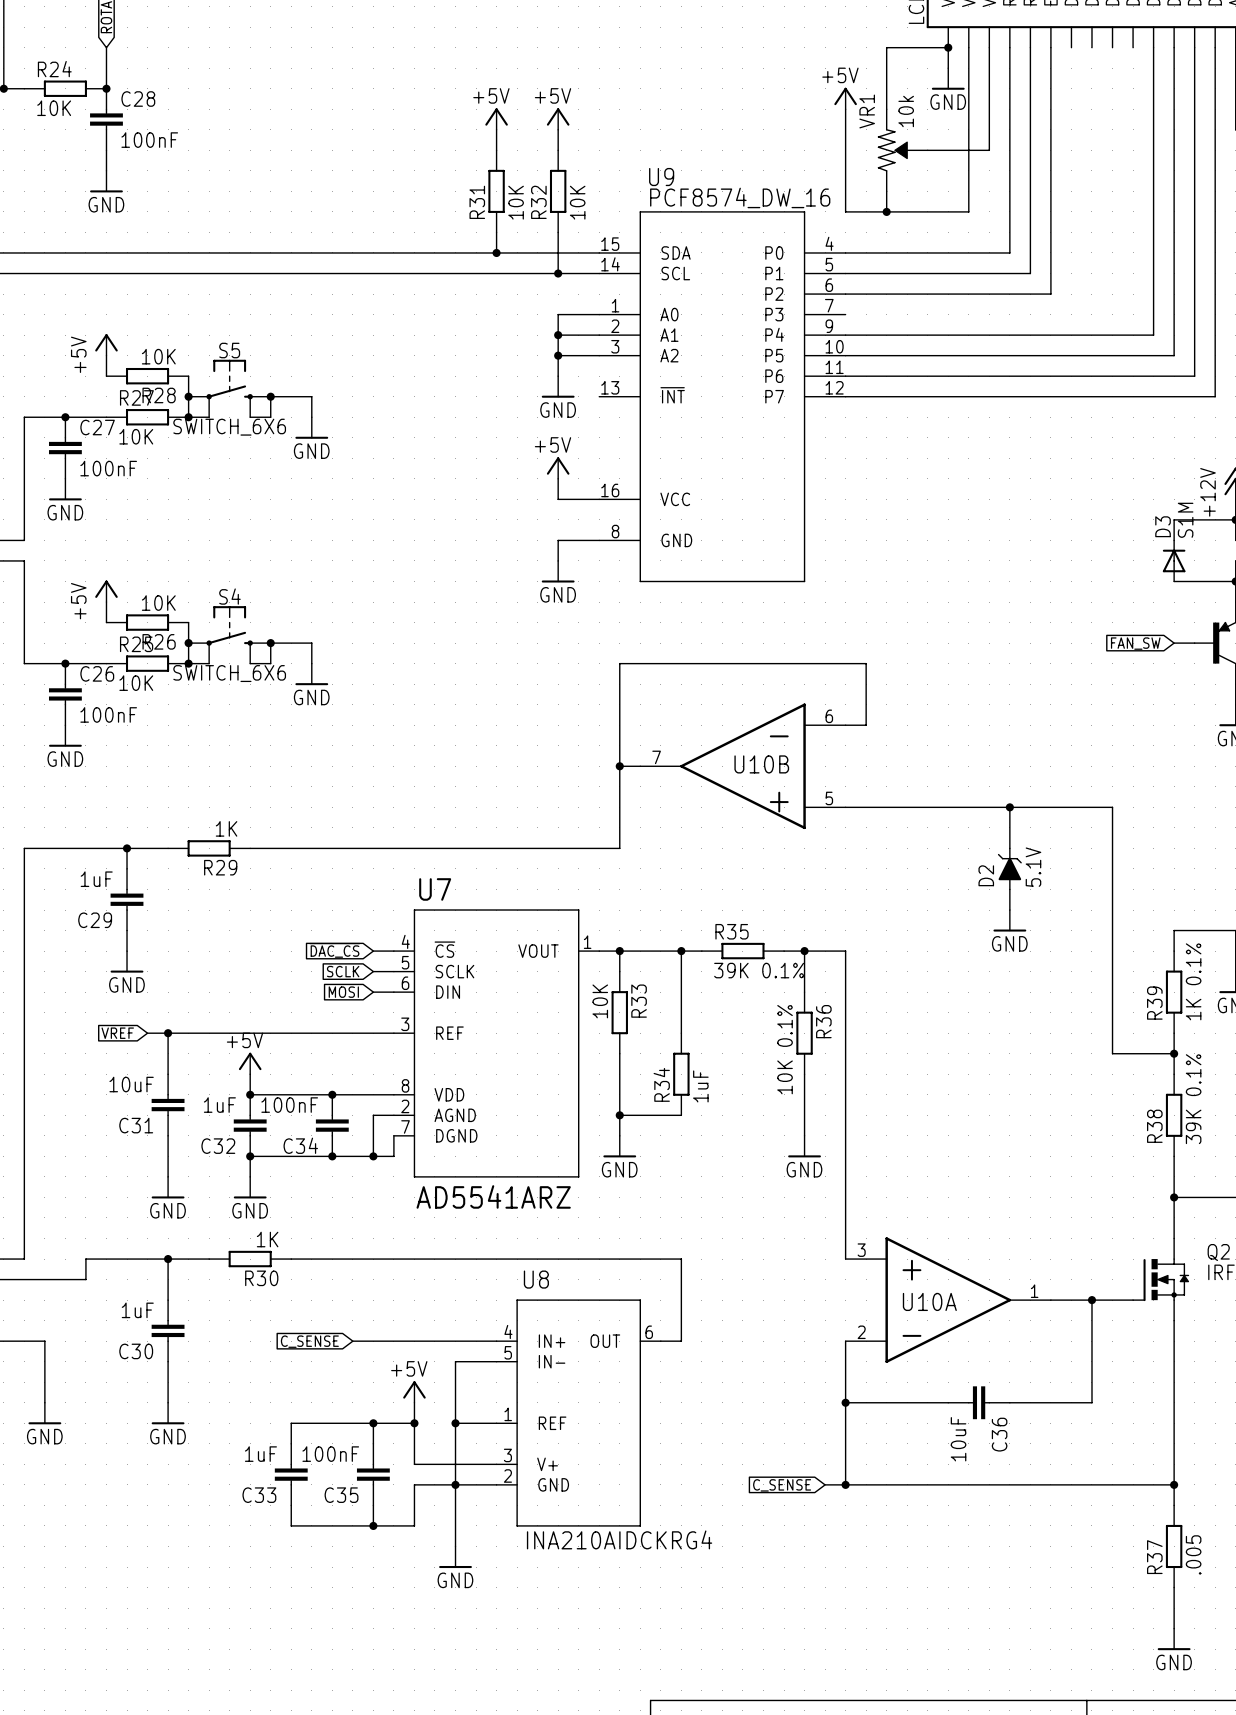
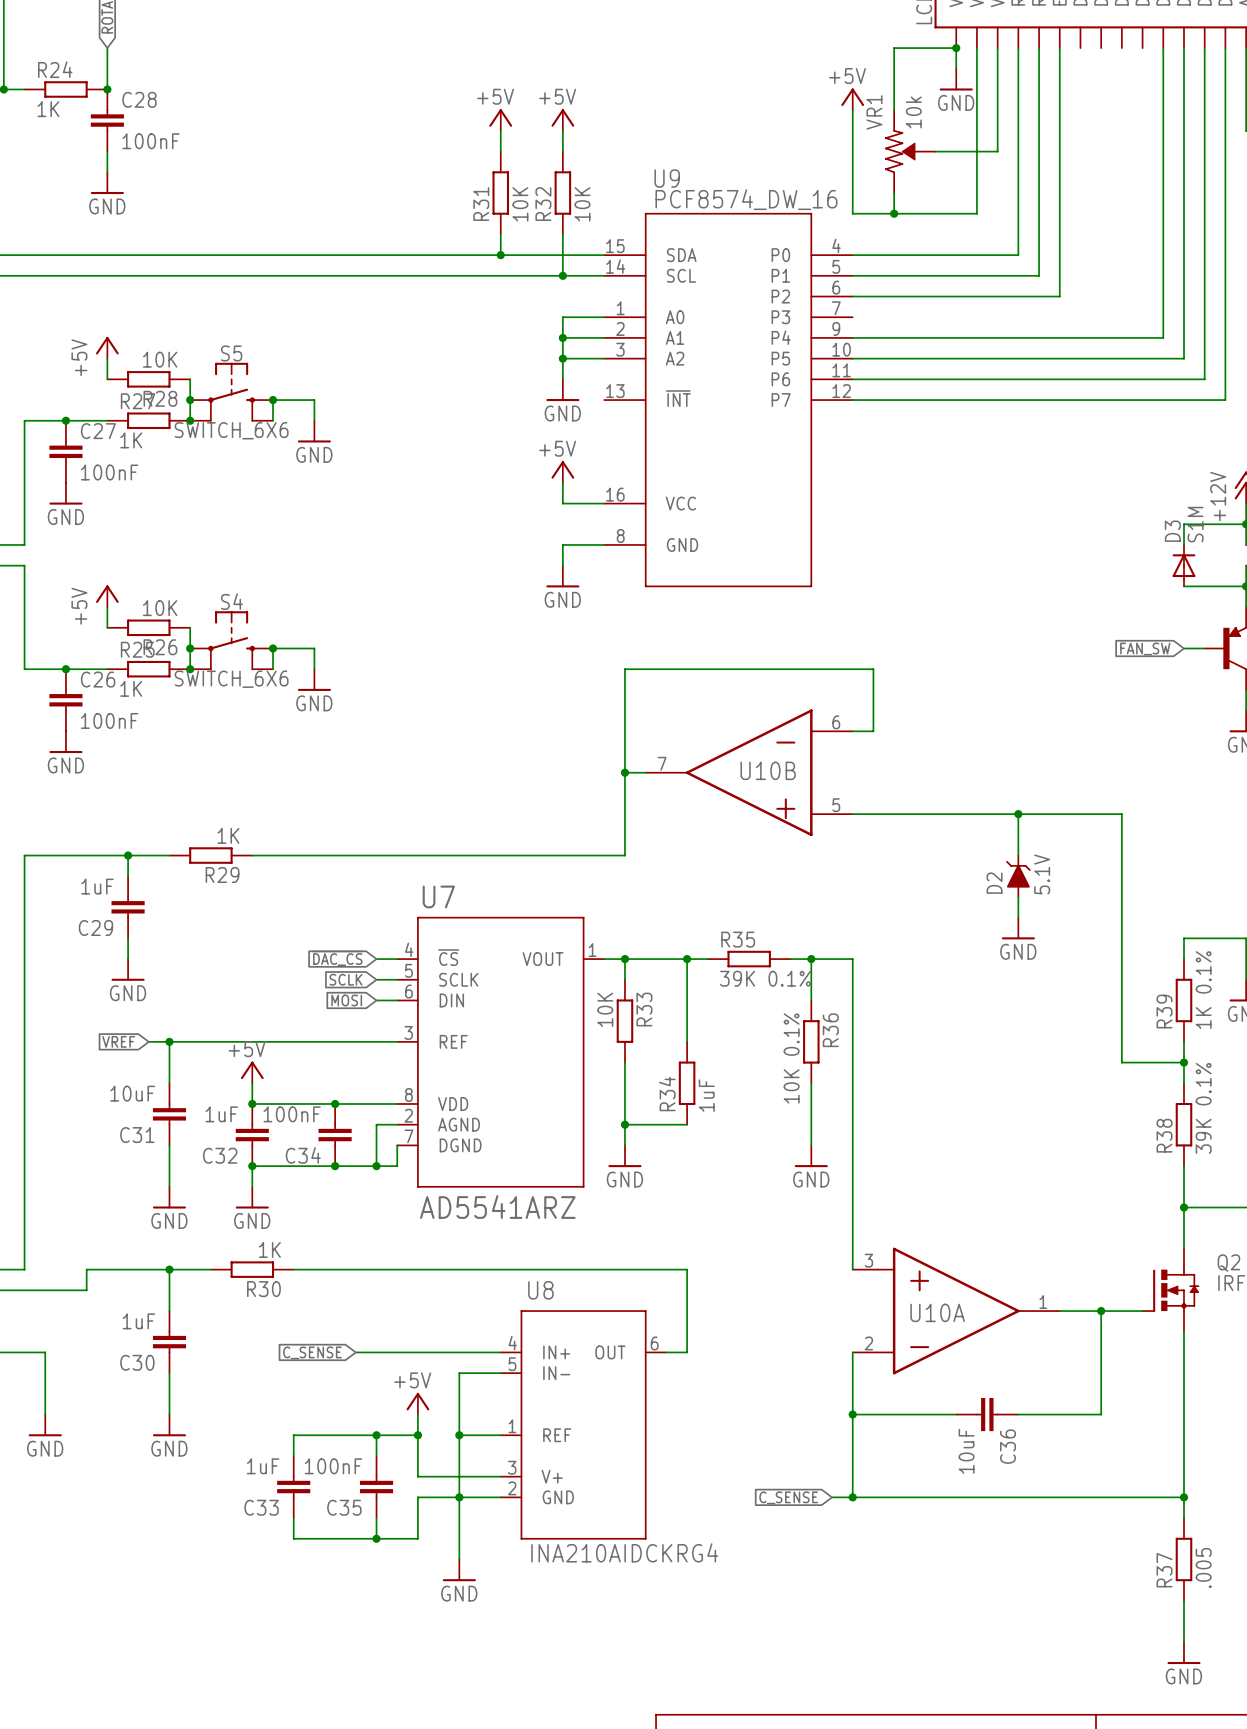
R24 value: 10K (54, 108) -> 1K (48, 109)
R27 value: 10K (136, 436) -> 1K (131, 440)
R25 value: 10K (136, 683) -> 1K (131, 688)

